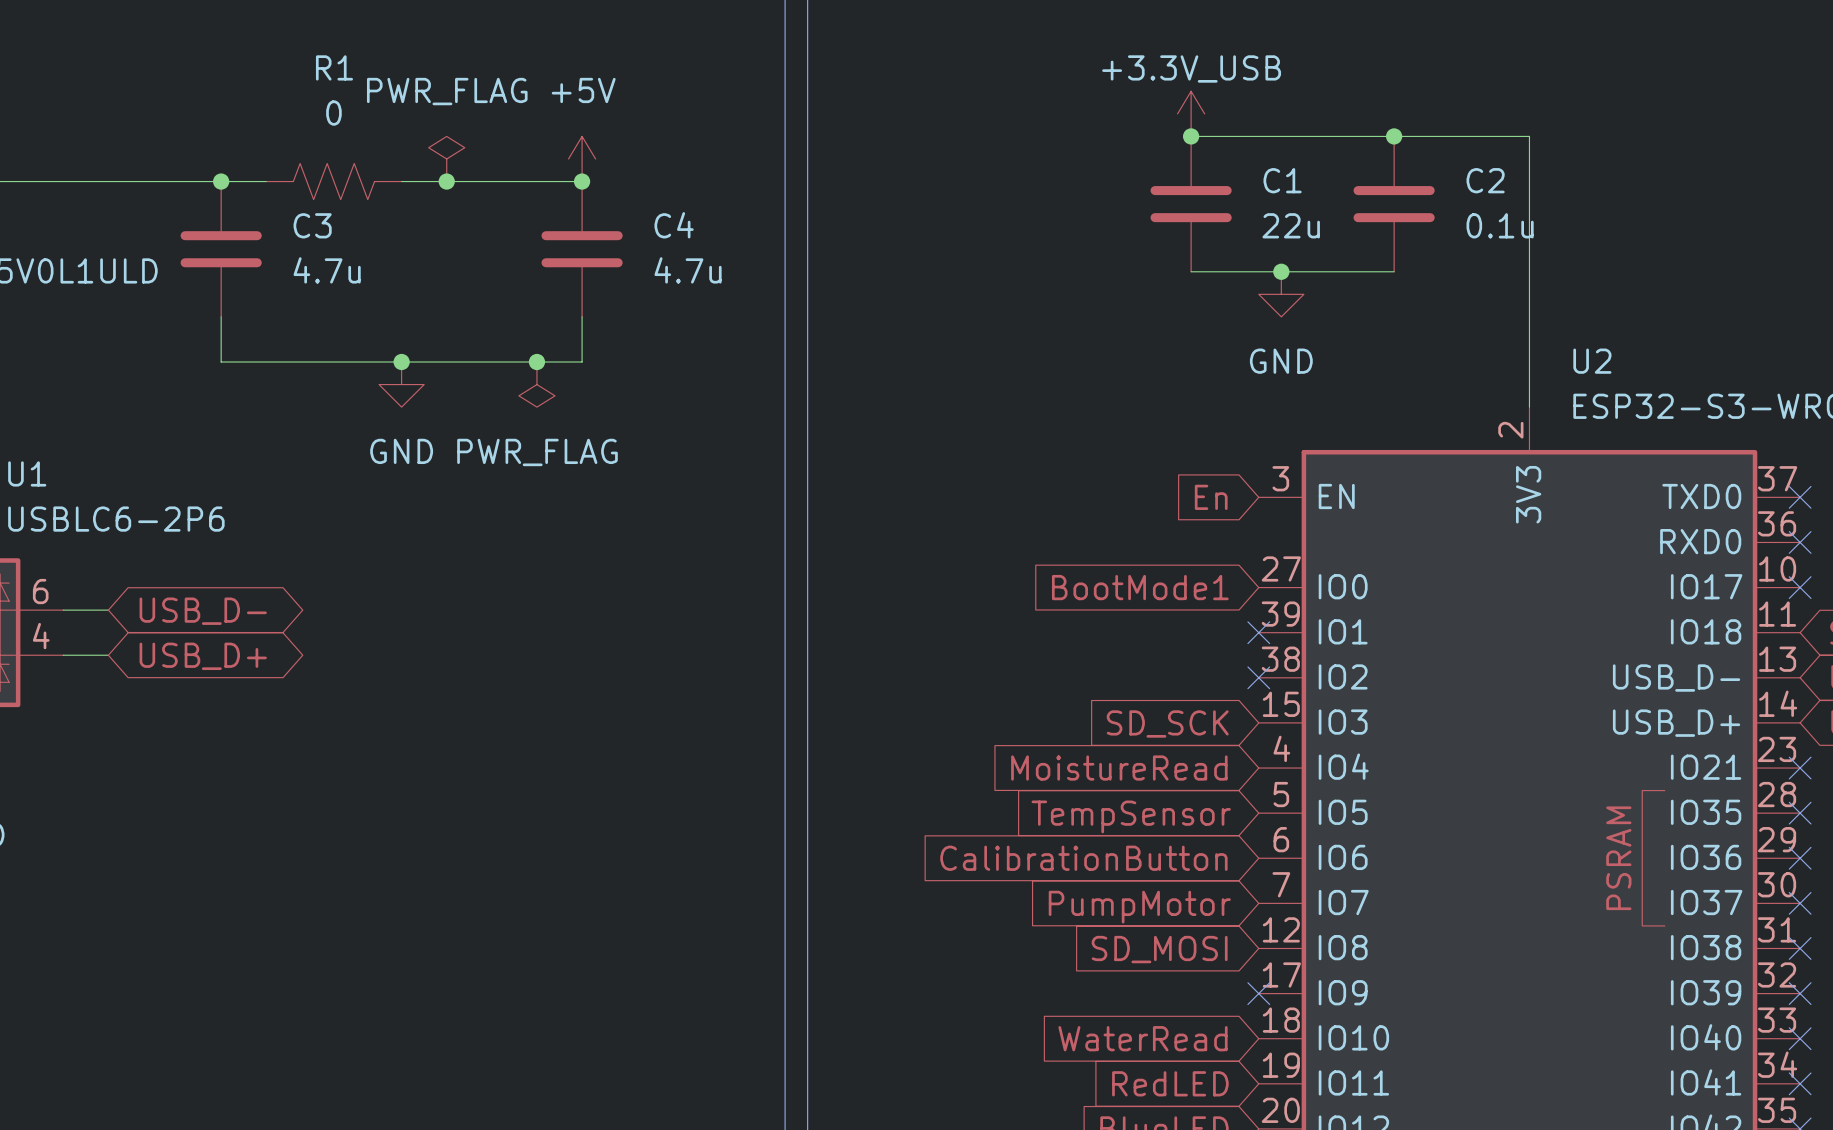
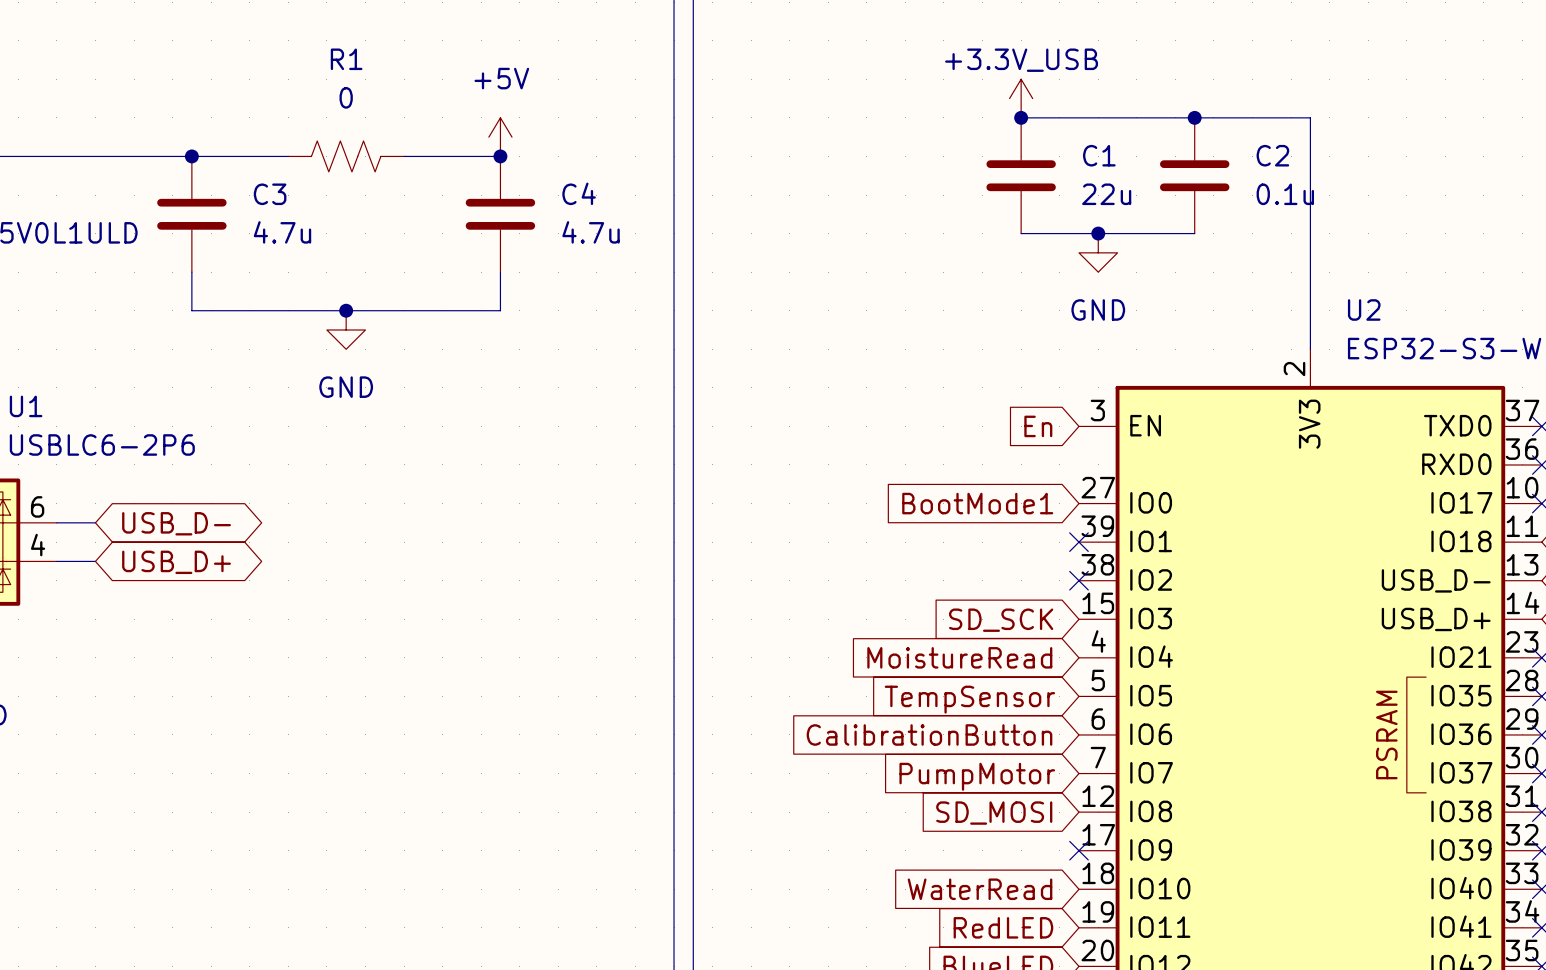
power symbol: PWR_FLAG (446, 158) -> none
R1 position: (333, 181) -> (346, 156)
wire: (401, 181) (469, 181) -> (230, 156) (288, 156)
junction: (446, 181) -> none
junction: (536, 362) -> none
power symbol: PWR_FLAG (536, 384) -> none

